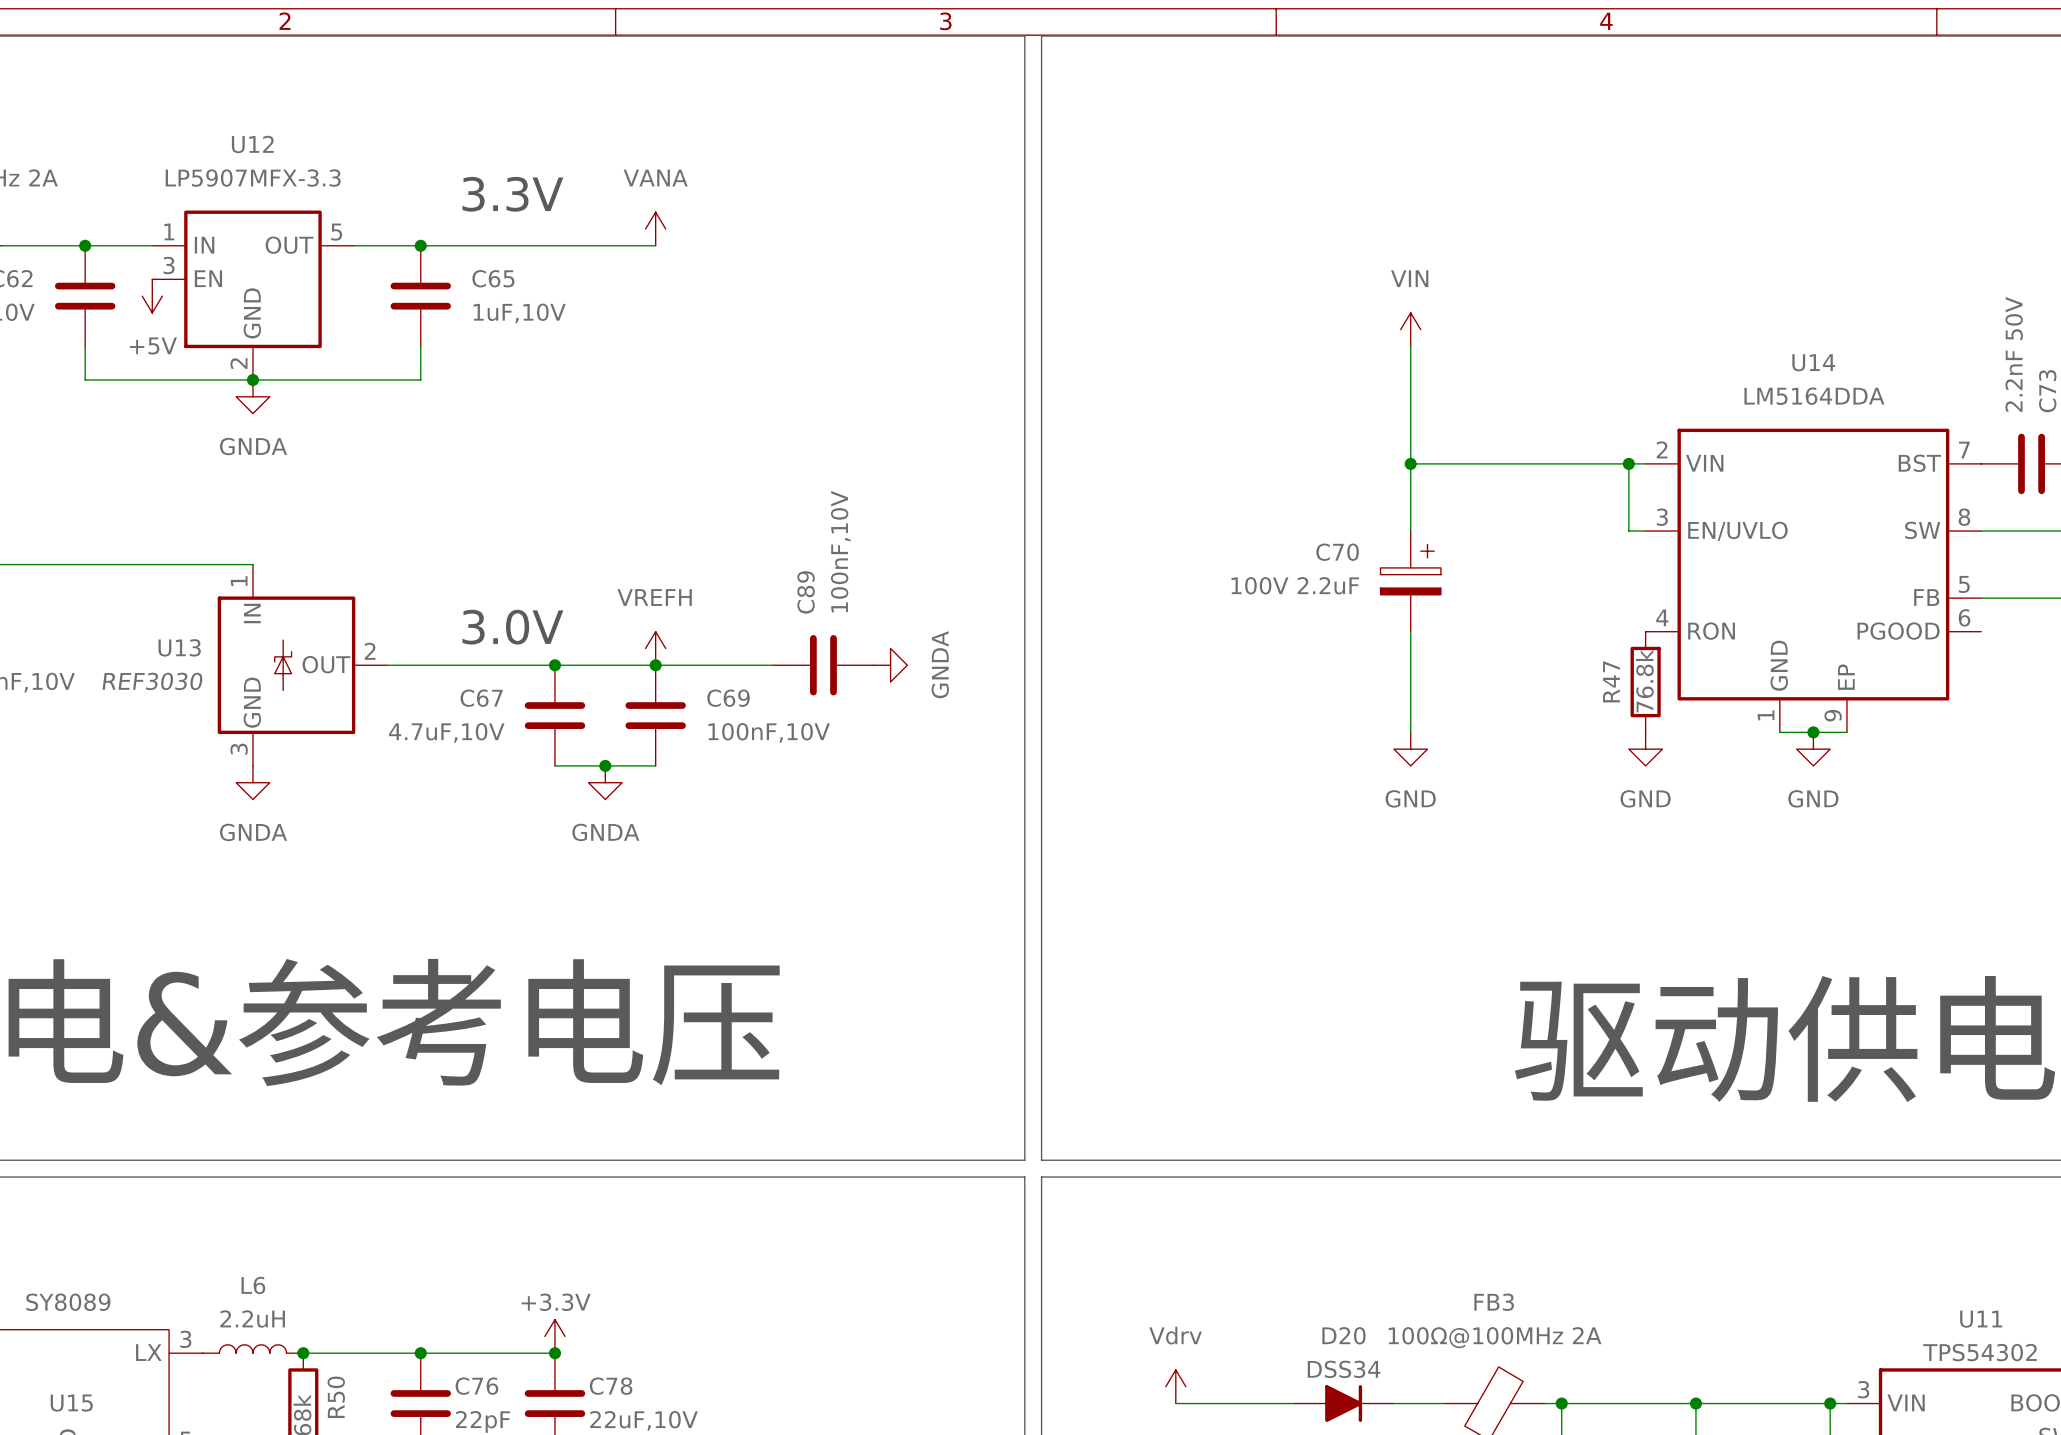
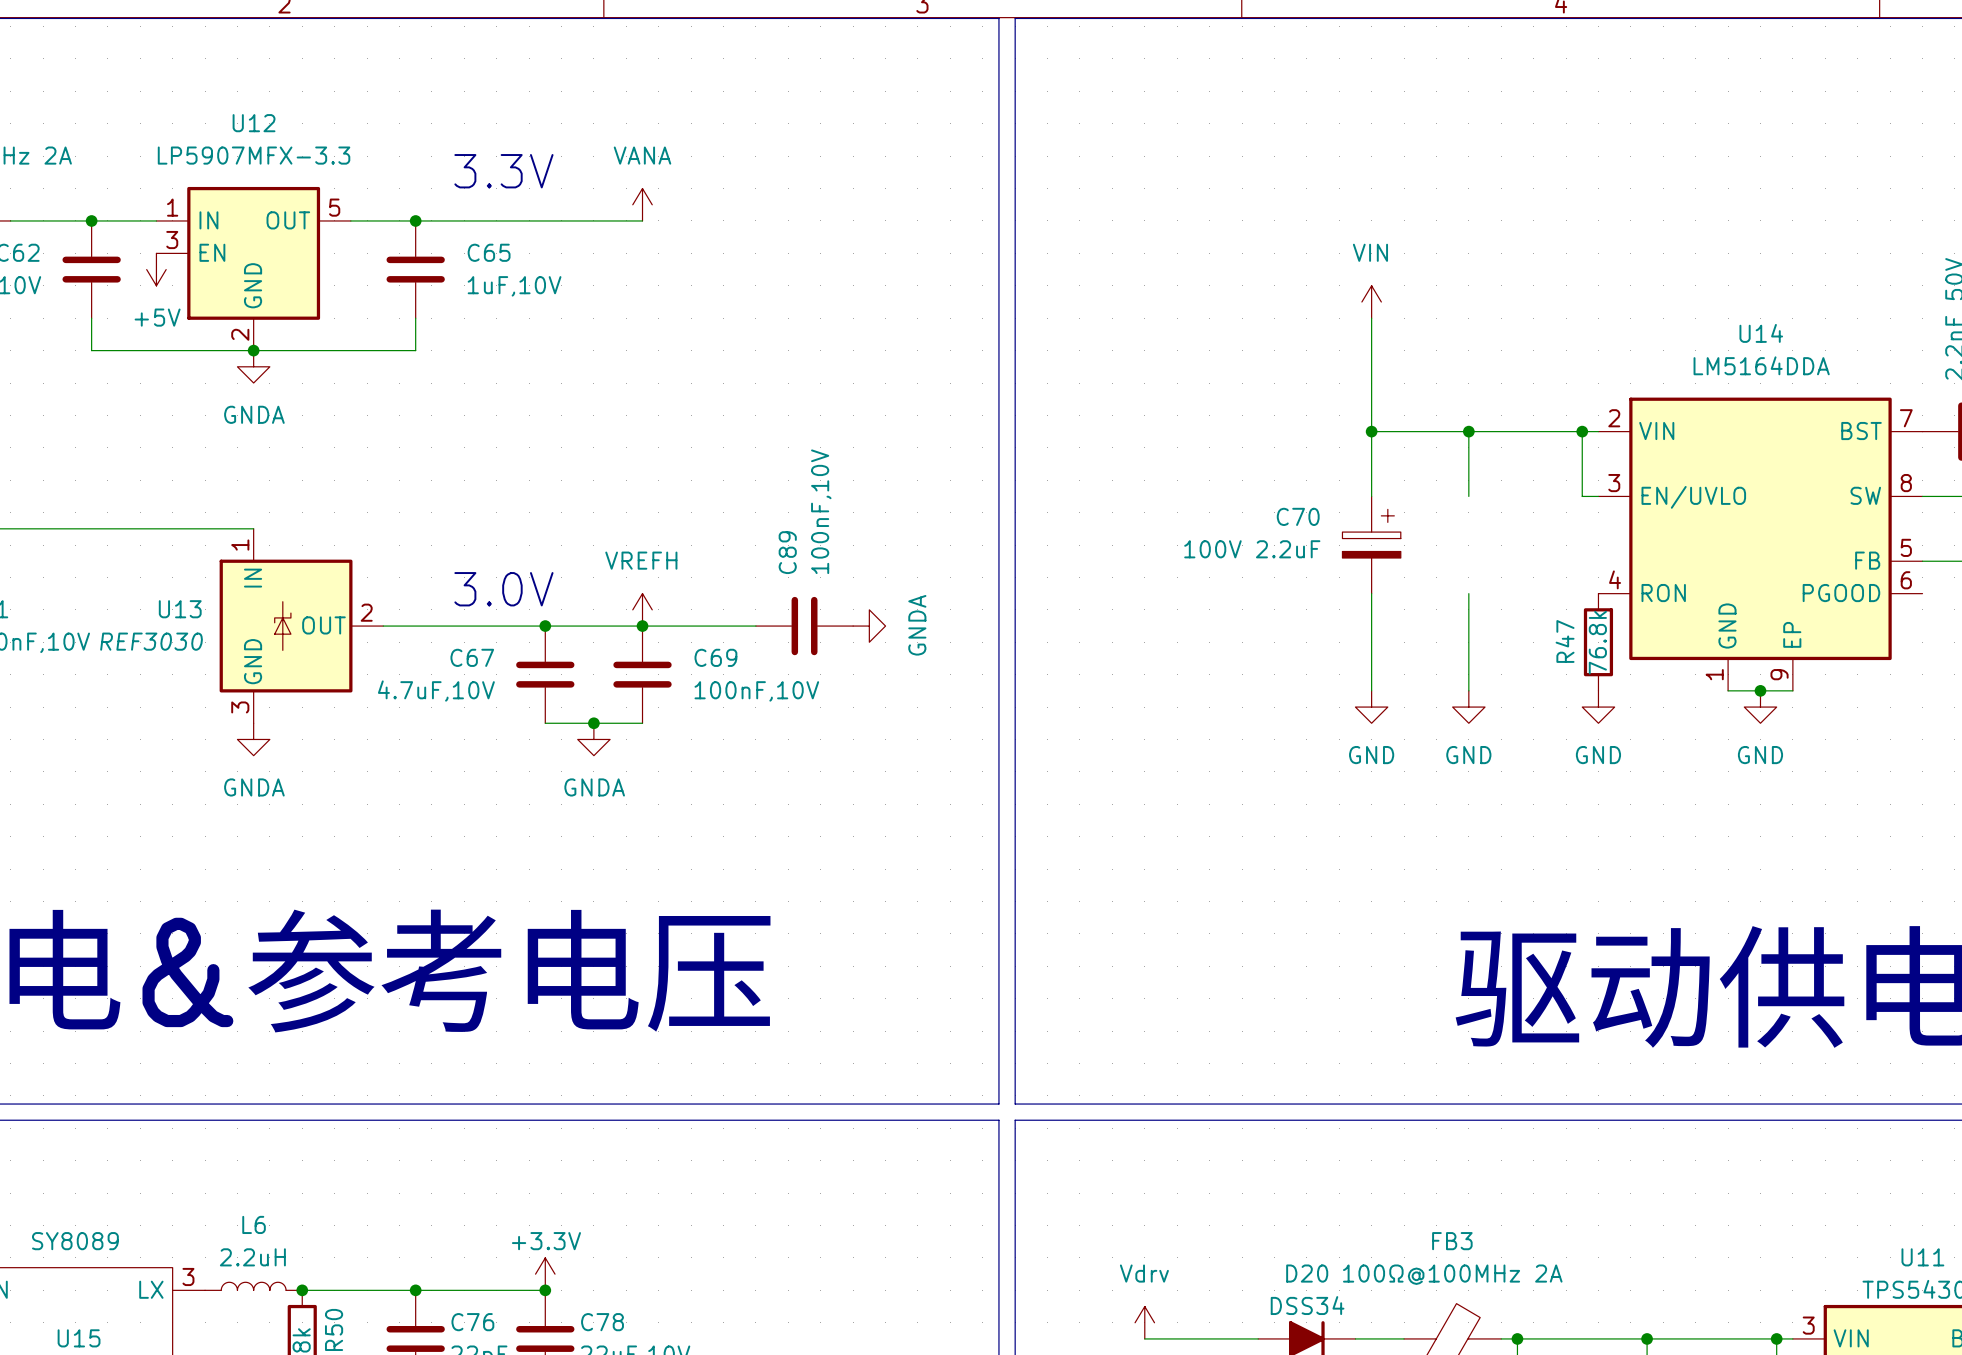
wire: none -> (1468, 431) (1468, 496)
junction: none -> (1468, 431)
wire: none -> (1468, 593) (1468, 690)
power symbol: none -> GND (1468, 707)

